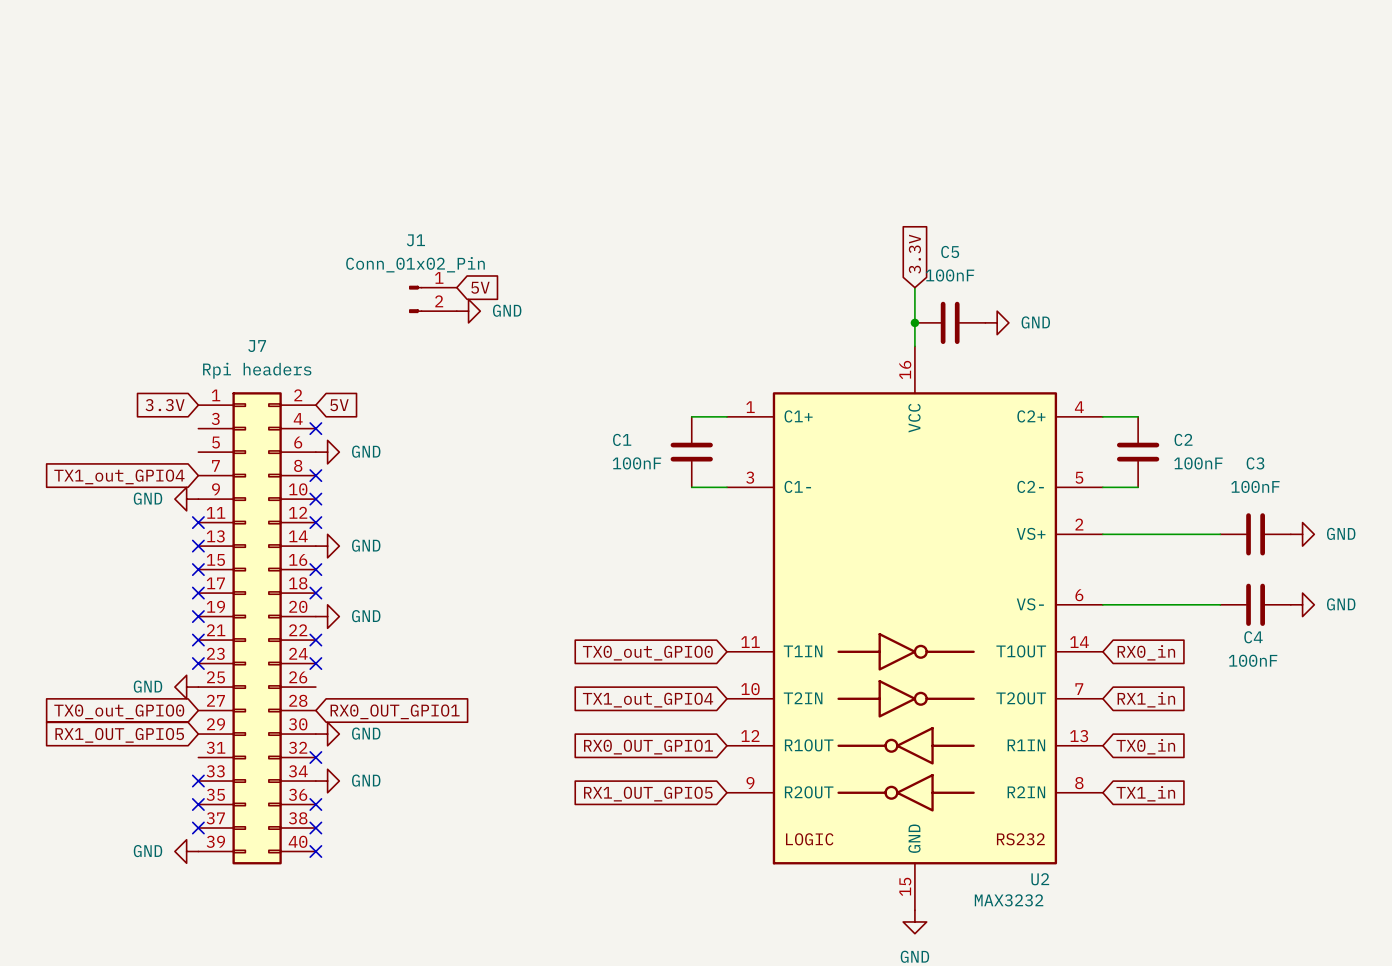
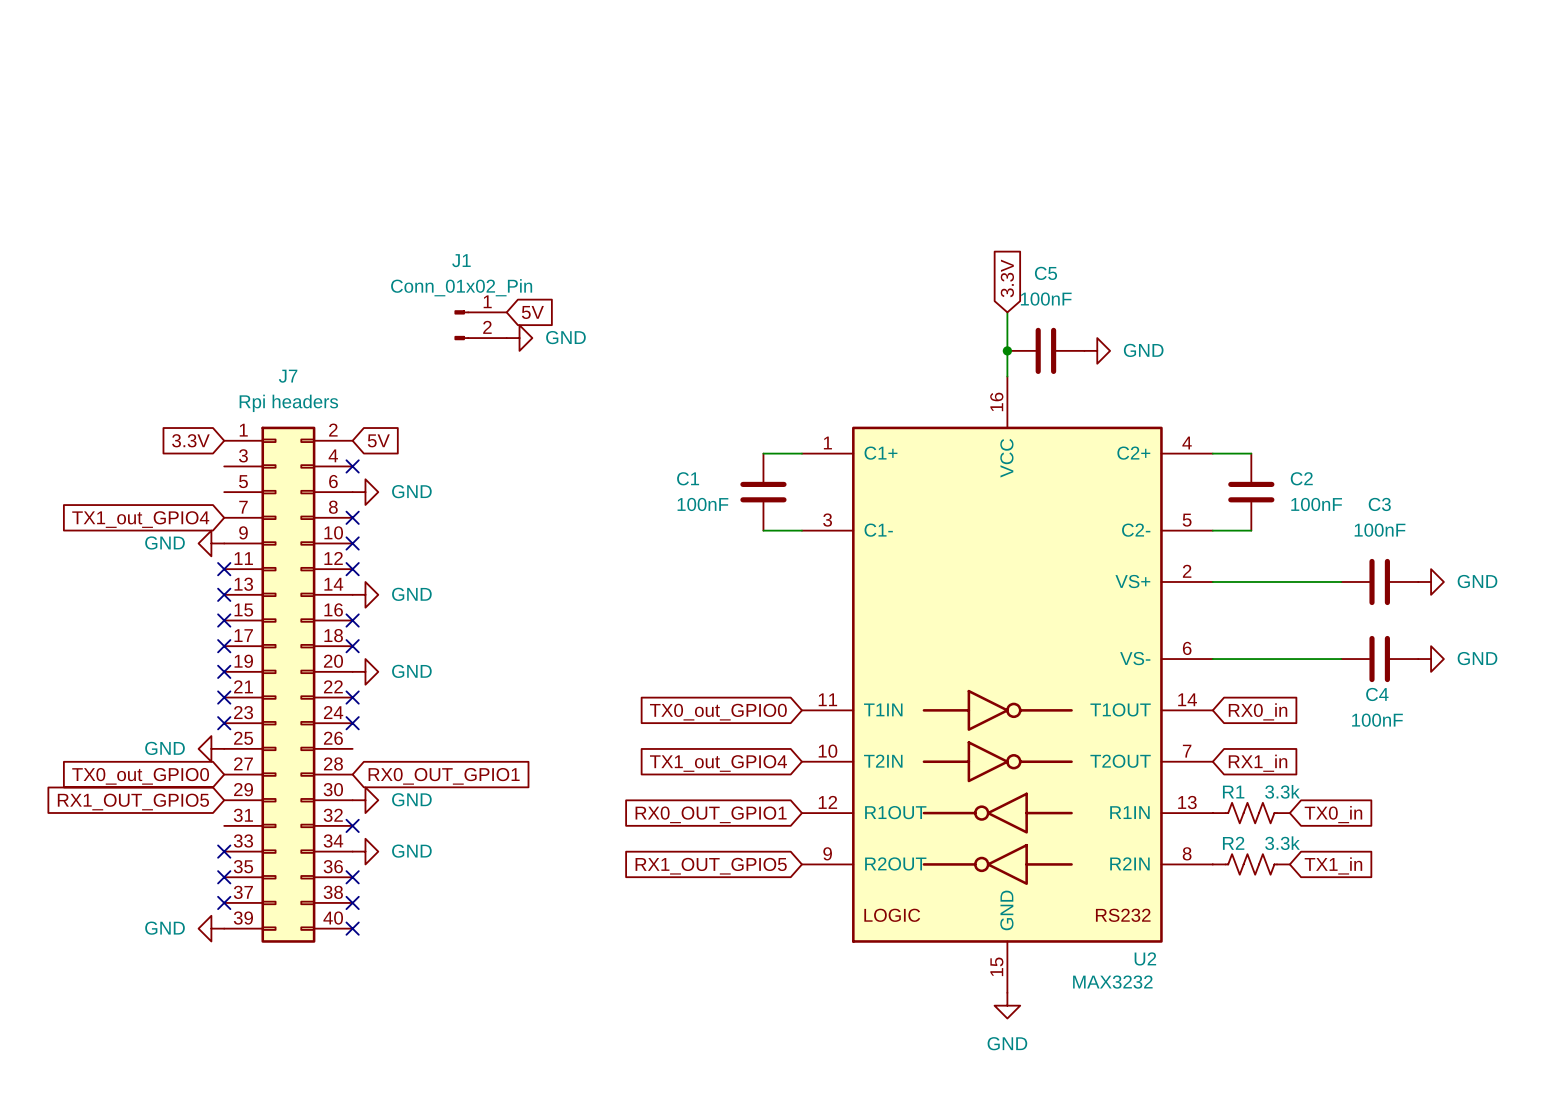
R1: none -> 3.3k (1251, 813)
global label position: TX0_in (1145, 746) -> TX0_in (1333, 814)
R2: none -> 3.3k (1251, 864)
global label position: TX1_in (1145, 793) -> TX1_in (1333, 865)

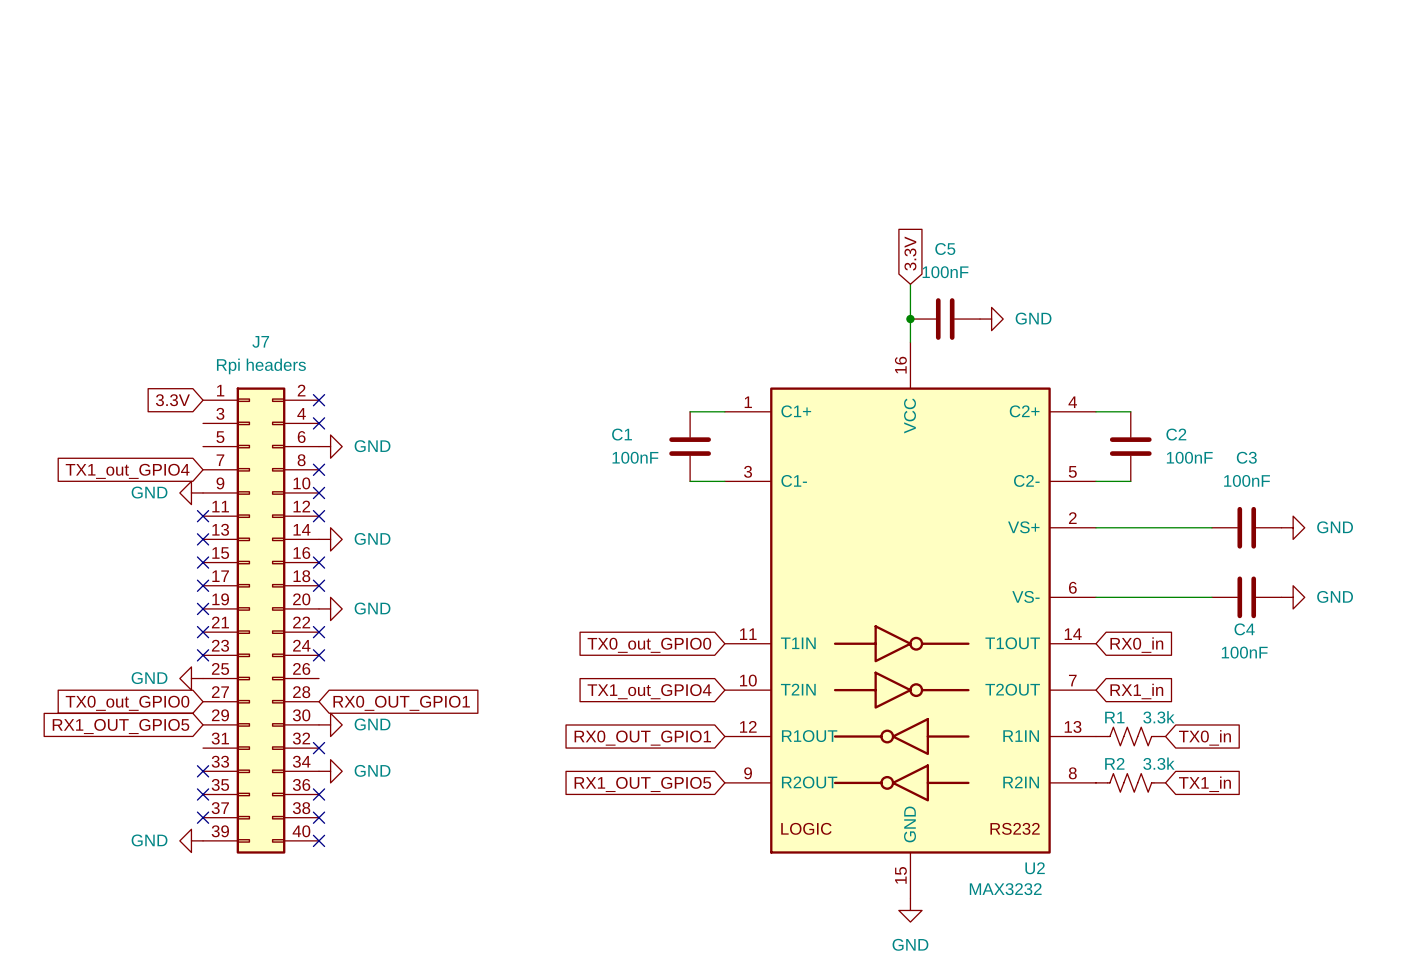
global label: 5V (532, 312) -> none
J1: Conn_01x02_Pin (480, 325) -> none
power symbol: GND (519, 338) -> none
no-connect mark: none -> (319, 400)
global label: 5V (378, 440) -> none

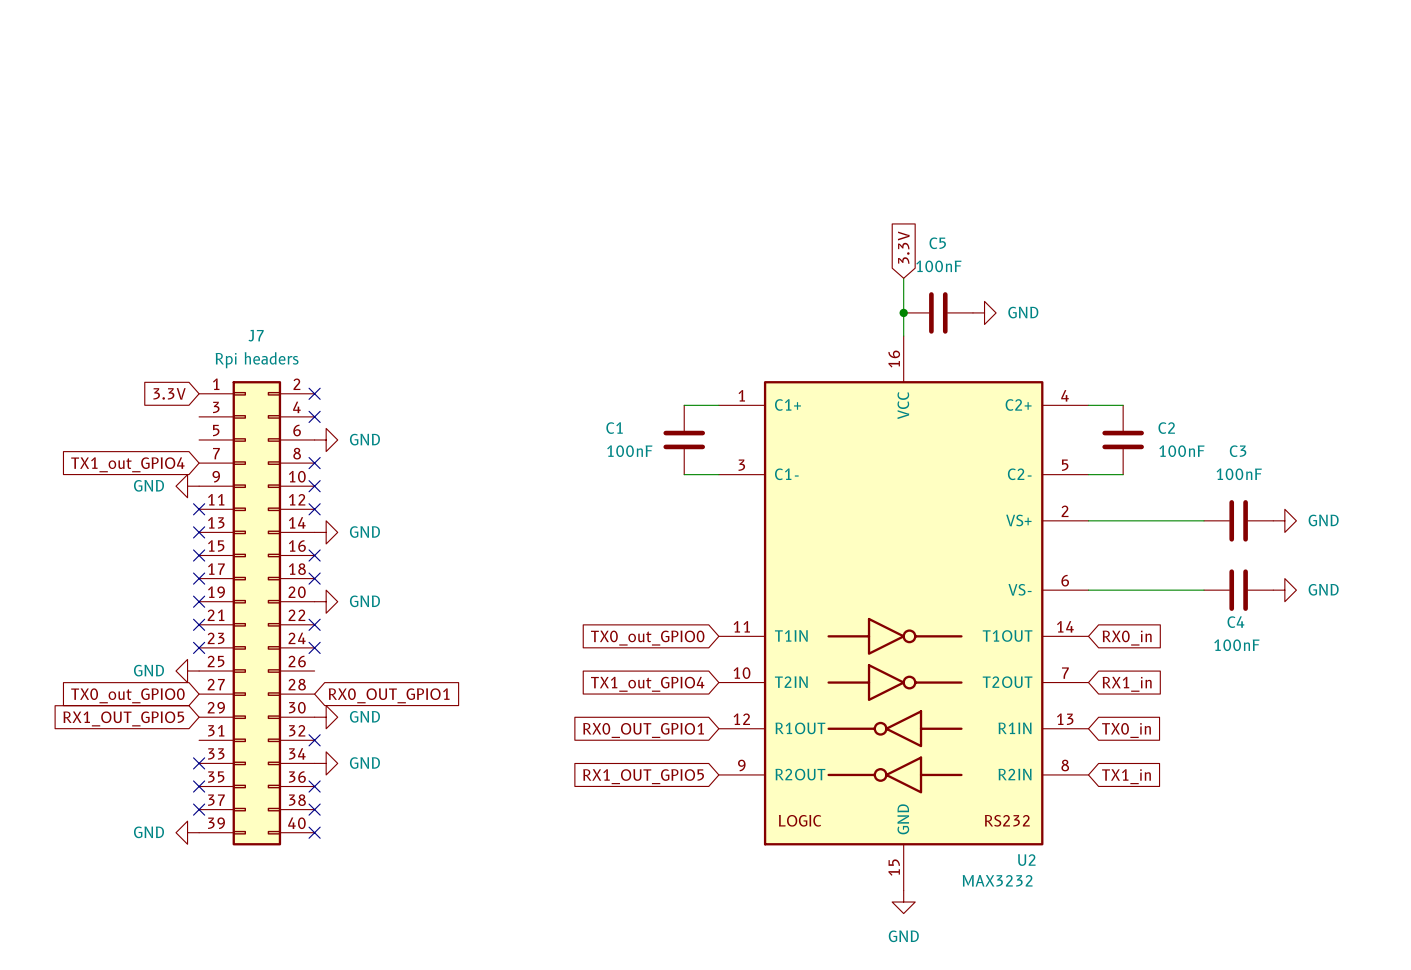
R1: 3.3k (1130, 736) -> none
global label position: TX0_in (1204, 737) -> TX0_in (1126, 730)
R2: 3.3k (1130, 782) -> none
global label position: TX1_in (1204, 784) -> TX1_in (1126, 776)

